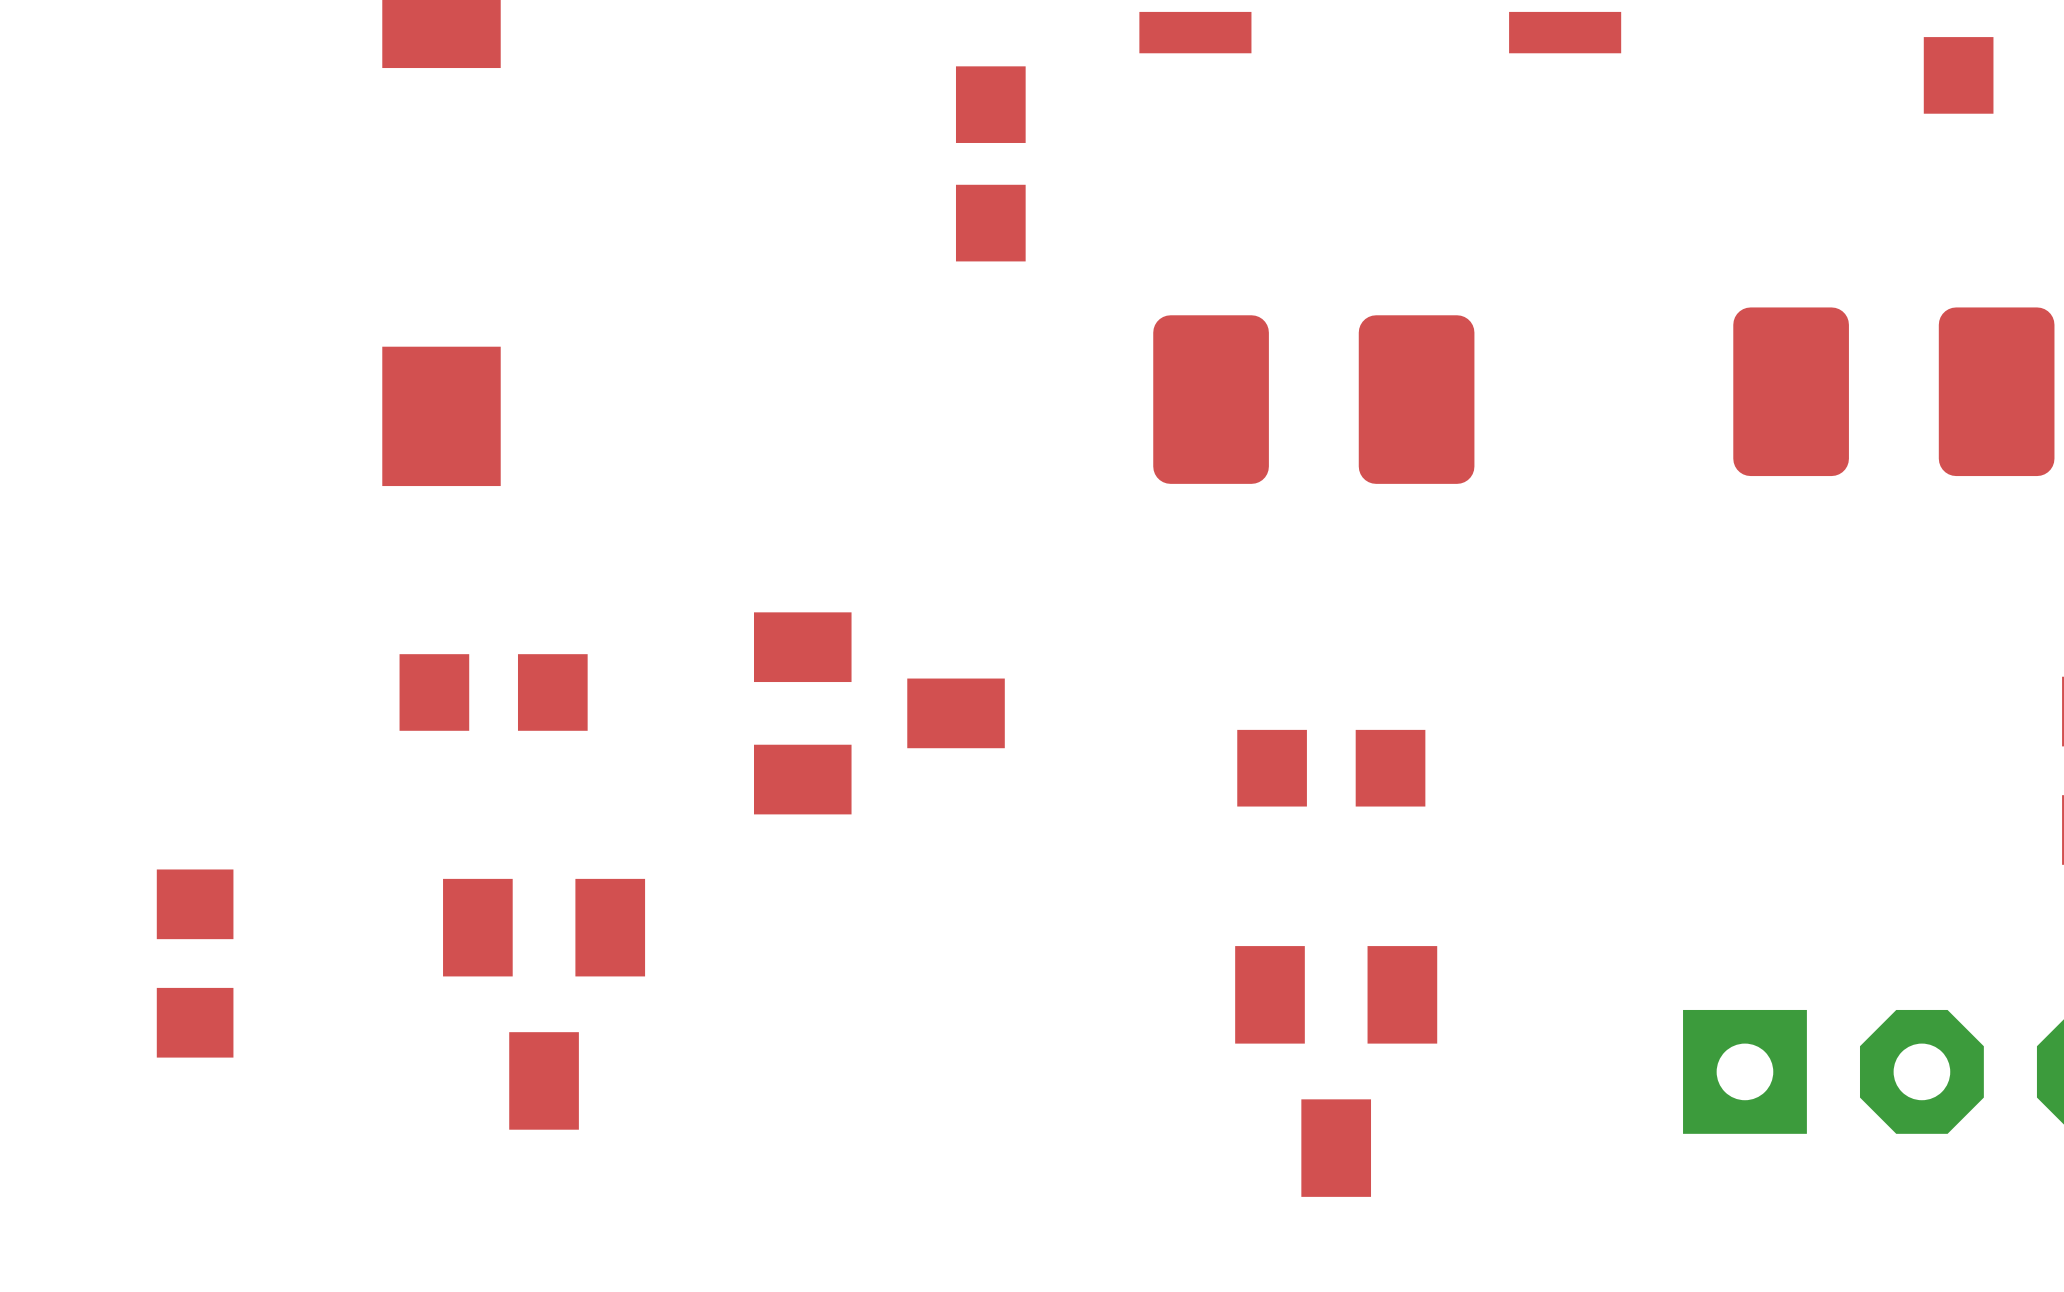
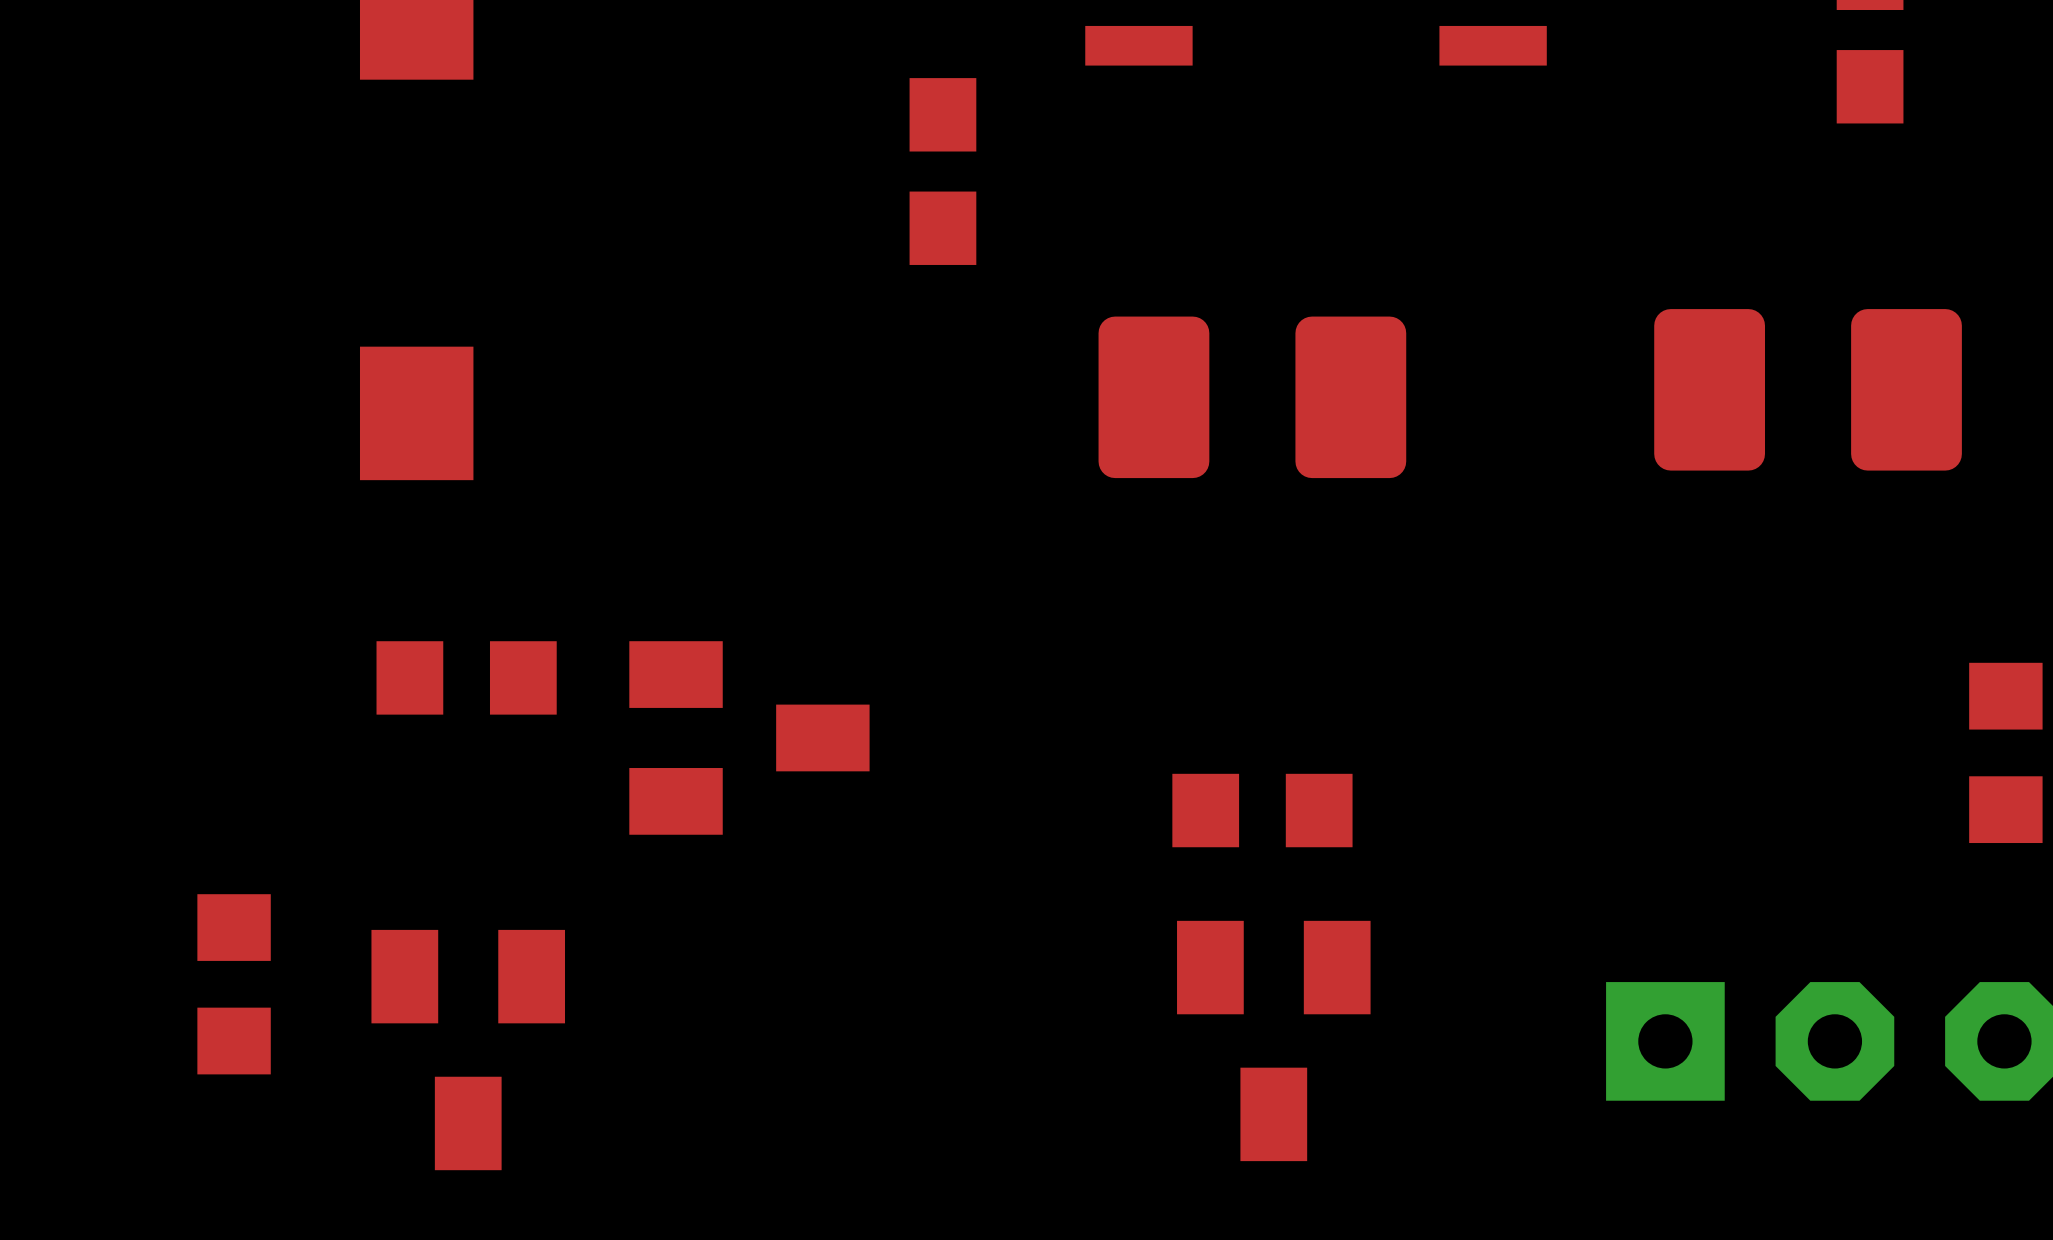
part position: (879, 713) -> (749, 737)
part position: (1331, 768) -> (1262, 810)
part position: (195, 963) -> (234, 984)
part position: (544, 1004) -> (468, 1050)

